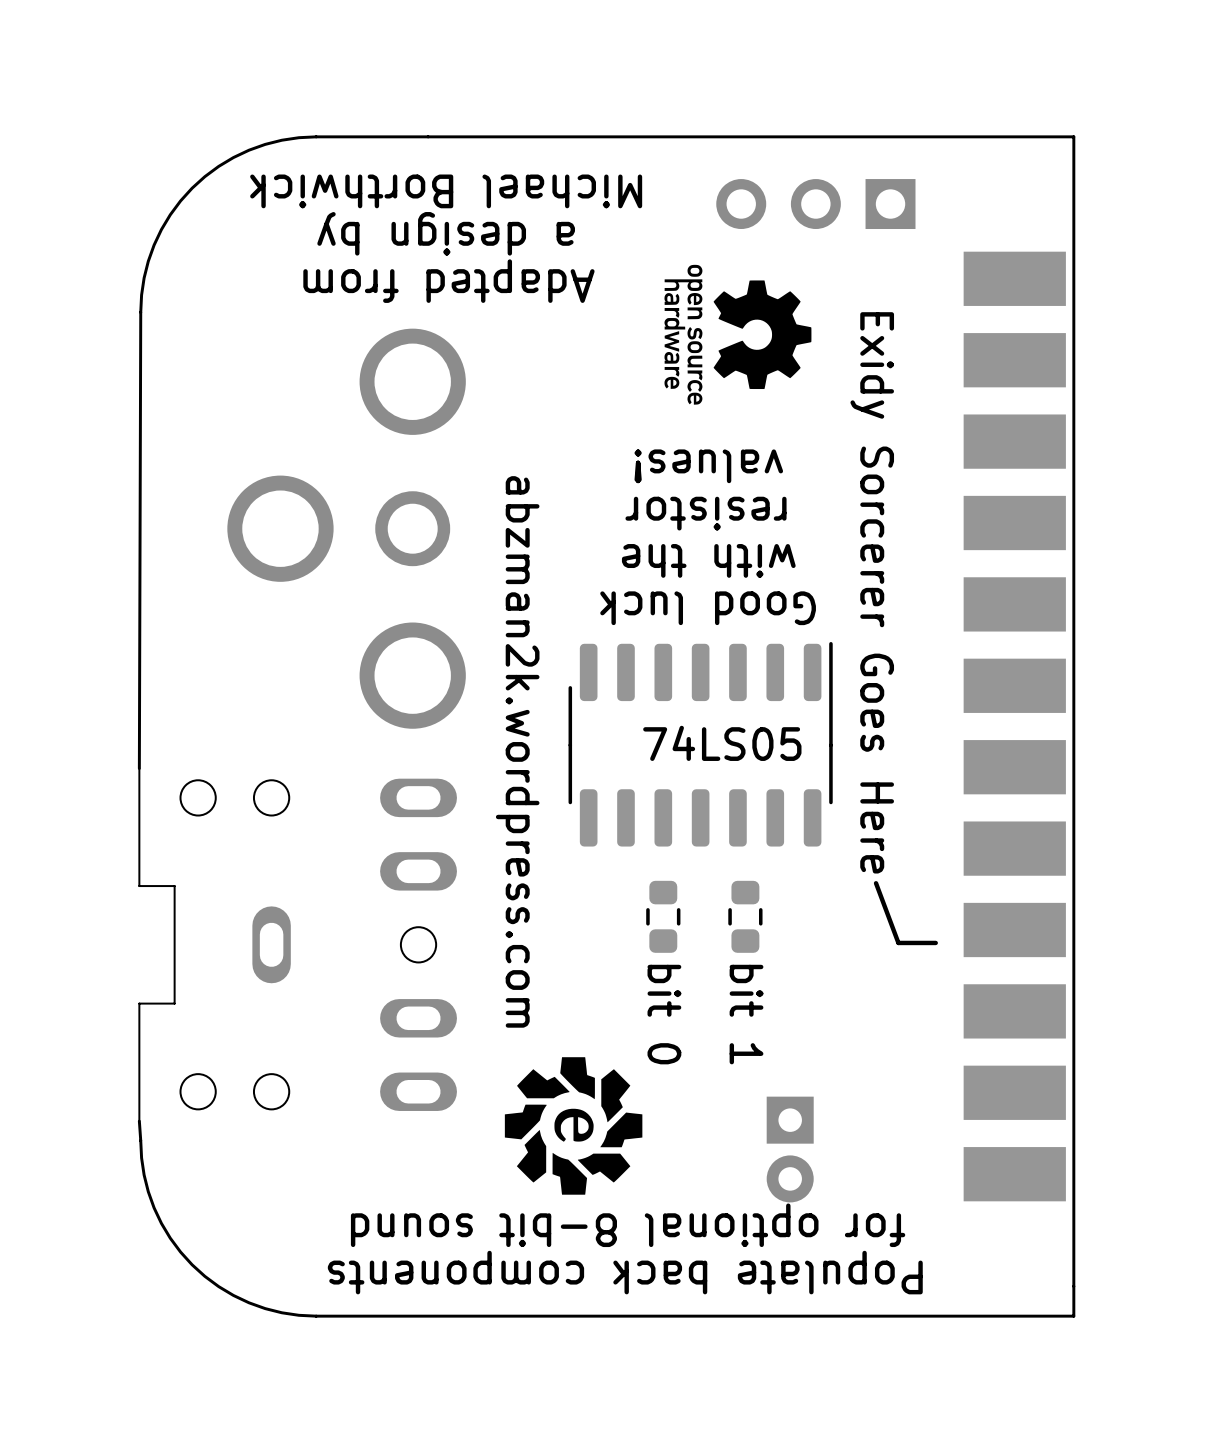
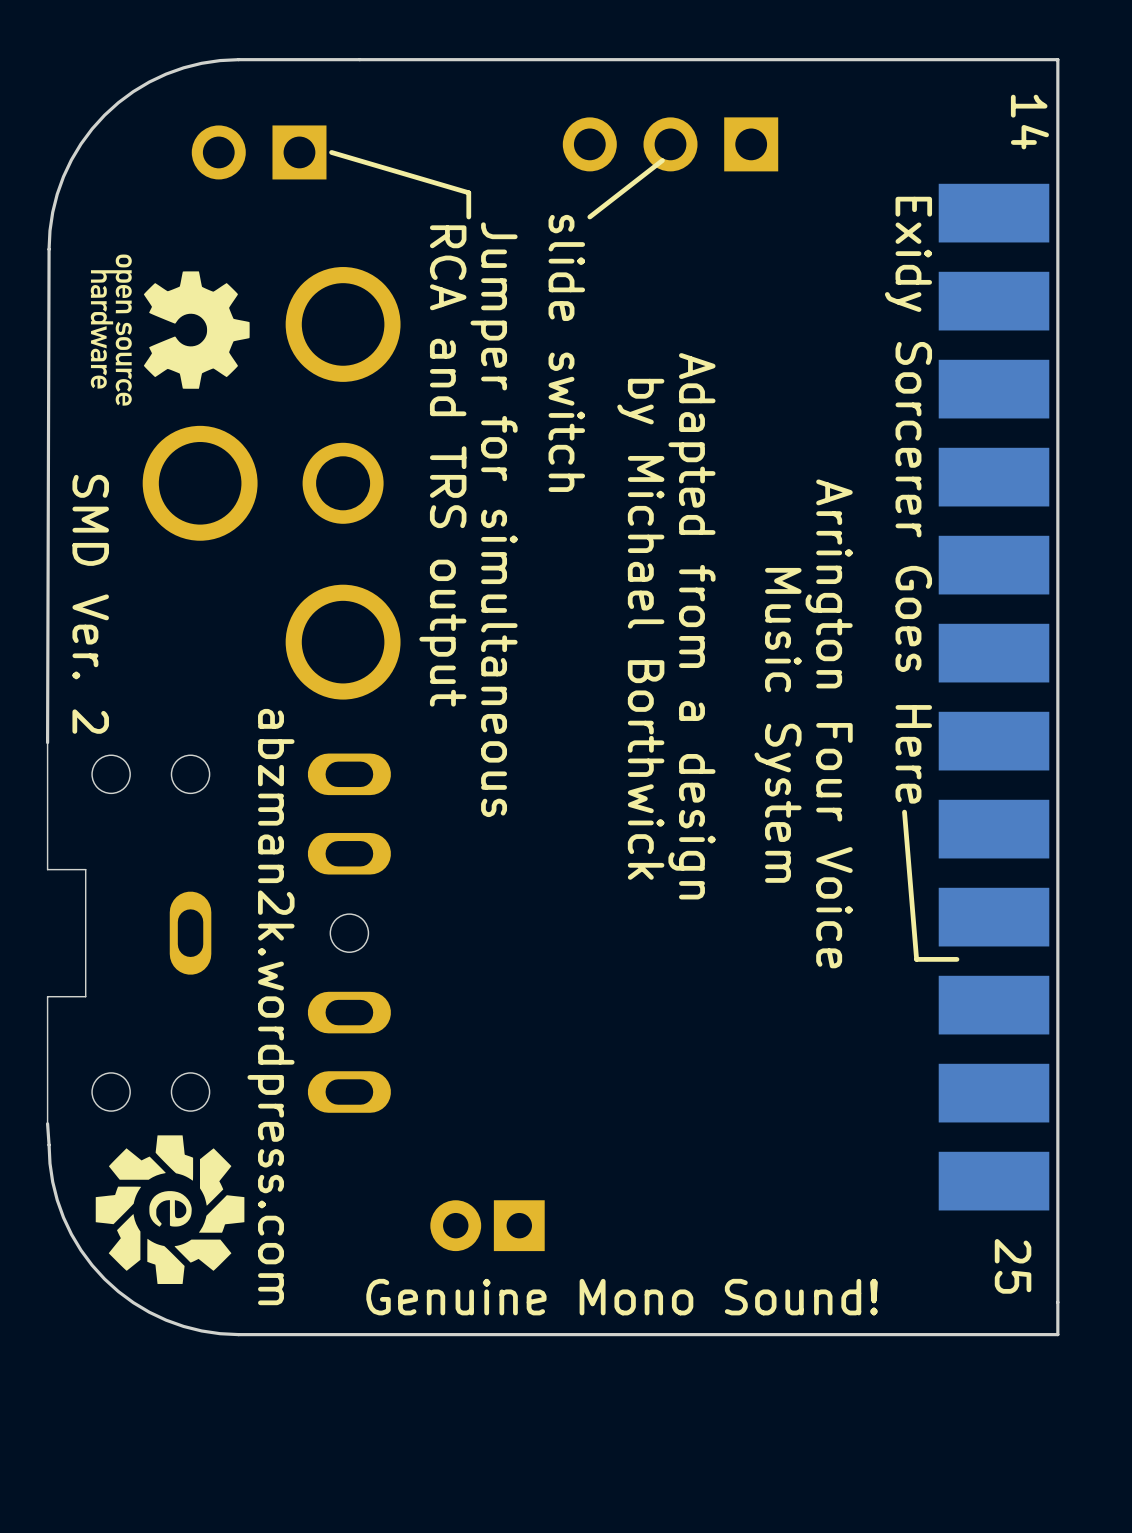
text: Michael Borthwick (446, 191) -> none
text: none -> 14 (1029, 122)
part position: (815, 204) -> (670, 144)
part: none -> (259, 152)
line: none -> (331, 152) (468, 192) (468, 217)
line: none -> (662, 160) (589, 217)
text: a design by (446, 233) -> none
text: Adapted from (448, 281) -> none
drawing position: (737, 334) -> (170, 330)
text: none -> slide switch (566, 353)
text: values! (708, 466) -> none
text: none -> RCA and TRS output (442, 465)
text: resistor (705, 513) -> none
text: with the (708, 560) -> none
text: none -> Jumper for simultaneous (494, 519)
text position: Exidy Sorcerer Goes Here (872, 592) -> Exidy Sorcerer Goes Here (908, 500)
text: Good luck (708, 608) -> none
text: none -> SMD Ver. 2 (90, 604)
text: none -> Adapted from a design (691, 626)
text: none -> by Michael Borthwick (640, 629)
part: 74LS05 (700, 744) -> none
text position: abzman2k.wordpress.com (517, 751) -> abzman2k.wordpress.com (271, 1007)
text: none -> Arrington Four Voice (829, 723)
text: none -> Music System (778, 725)
line: none -> (904, 812) (916, 959) (956, 959)
line: (876, 883) (898, 942) (935, 942) -> none
part: bit 0 (663, 916) -> none
part: bit 1 (745, 916) -> none
drawing position: (573, 1125) -> (170, 1209)
part rotation: 0° (790, 1149) -> 90° clockwise (487, 1225)
part position: (790, 1149) -> (487, 1225)
text: for optional 8-bit sound (628, 1225) -> none
text: none -> 25 (1013, 1266)
text: Populate back components (625, 1272) -> none
text: none -> Genuine Mono Sound! (622, 1297)

